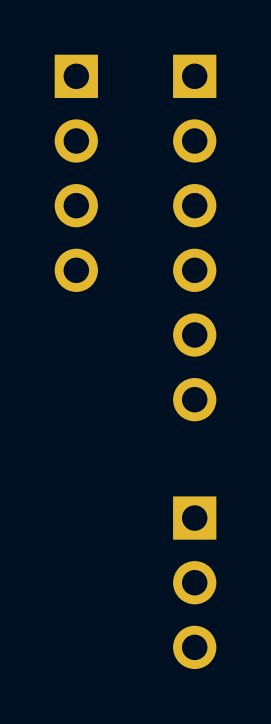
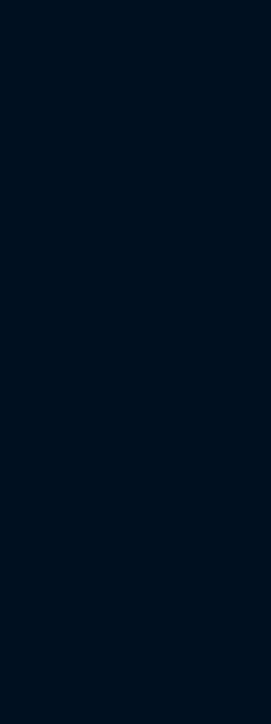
part: (76, 173) -> none
part: (194, 237) -> none
part: (194, 582) -> none

